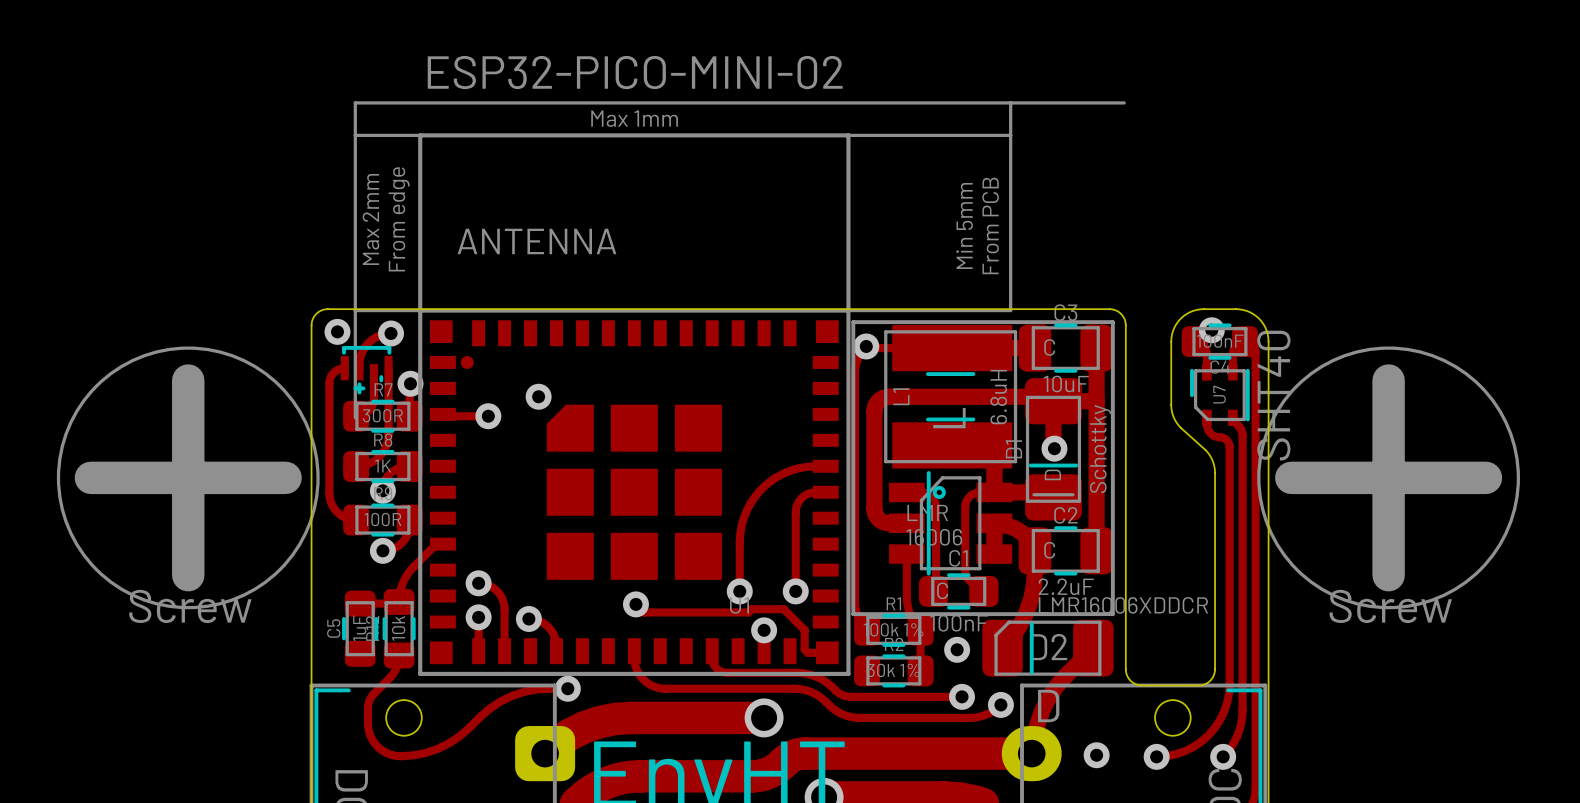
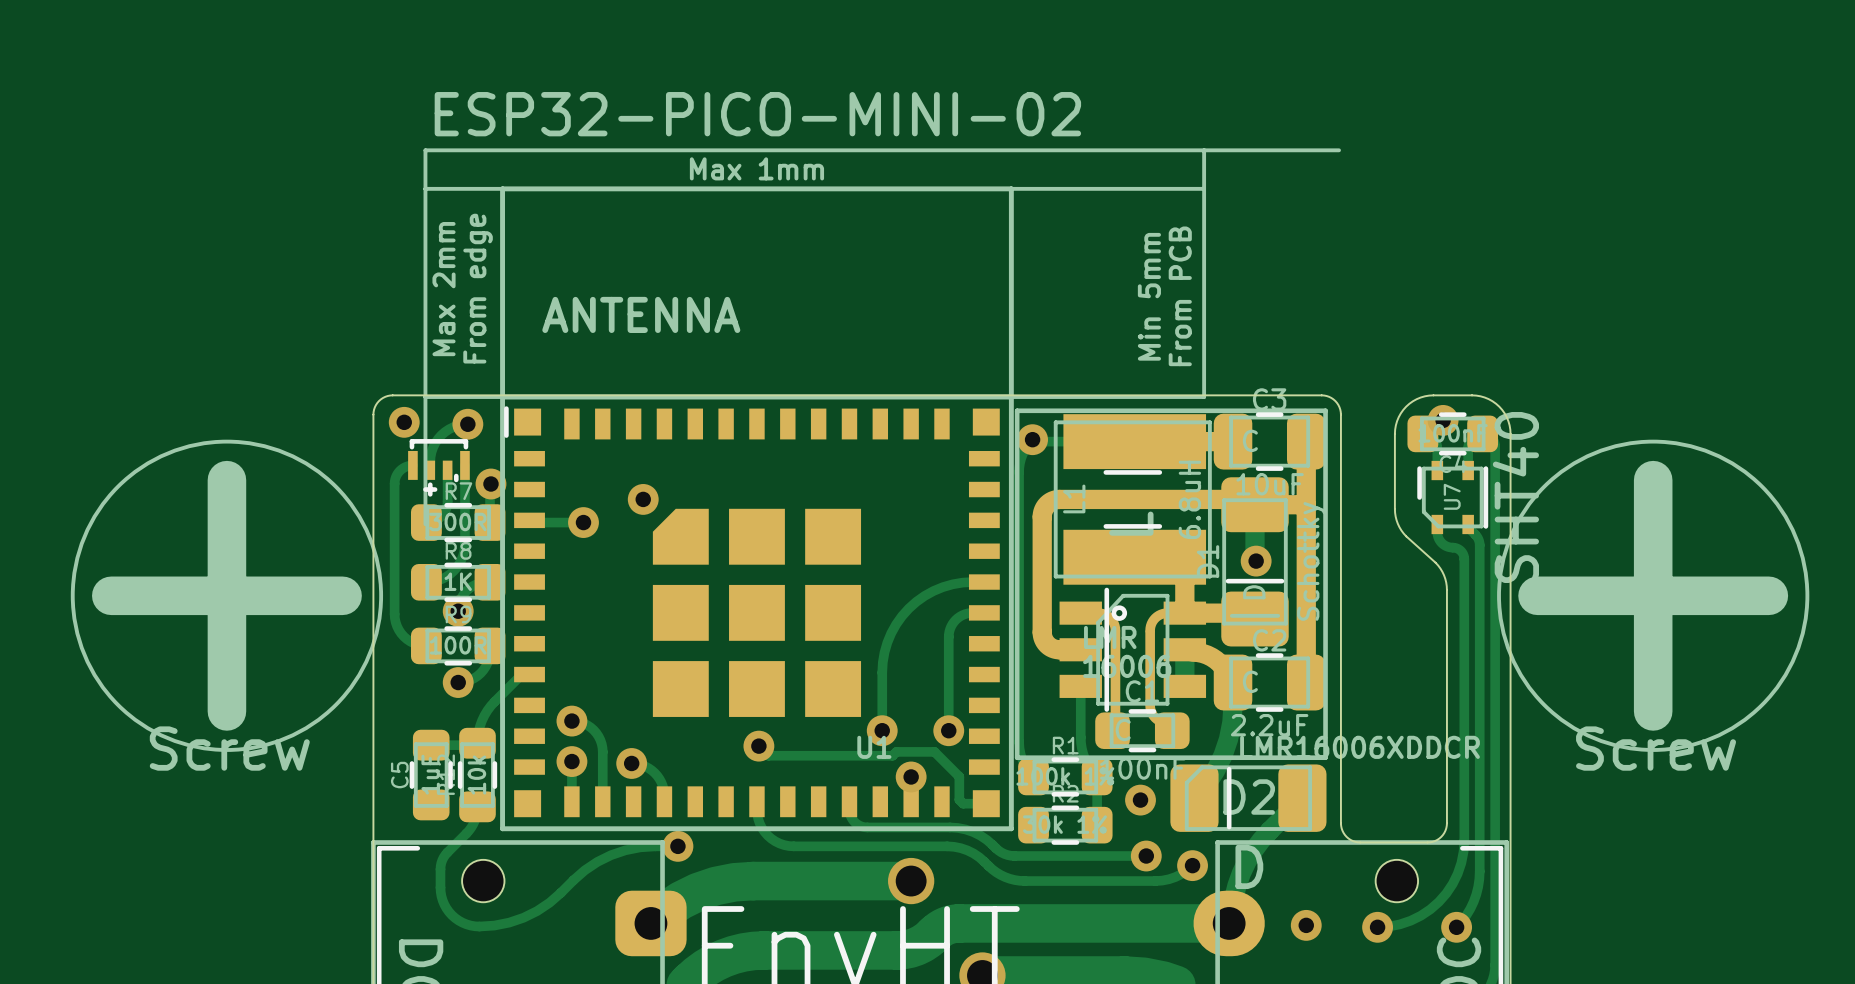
part footprint: [353, 101, 1126, 676] -> [423, 148, 1341, 832]

